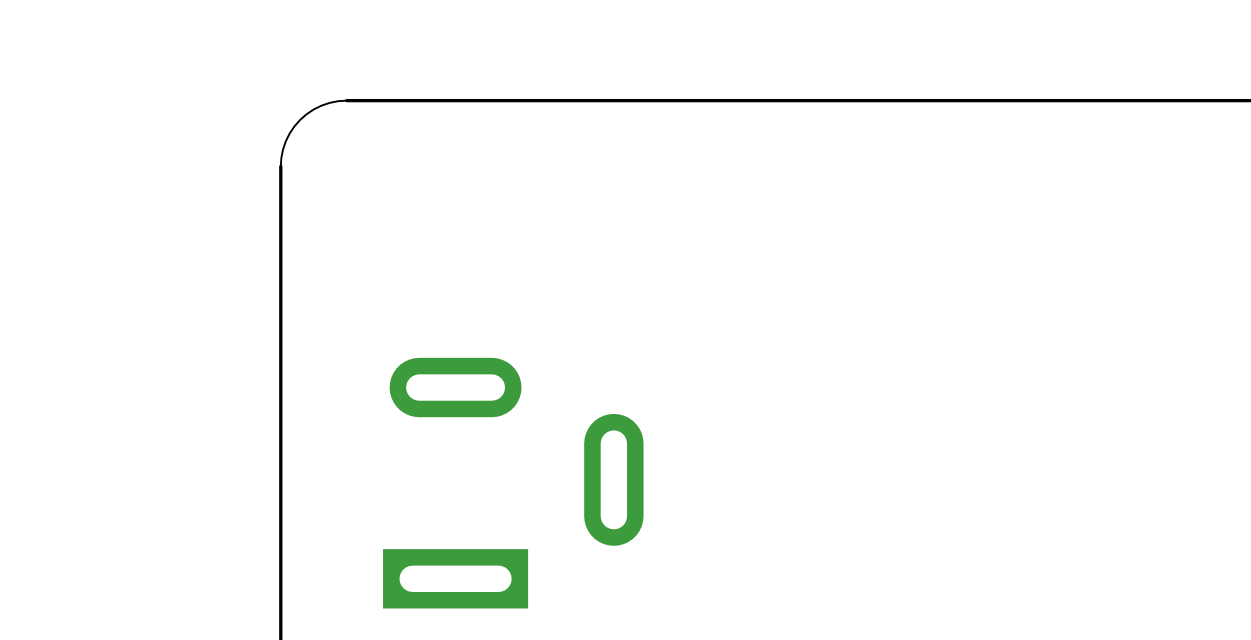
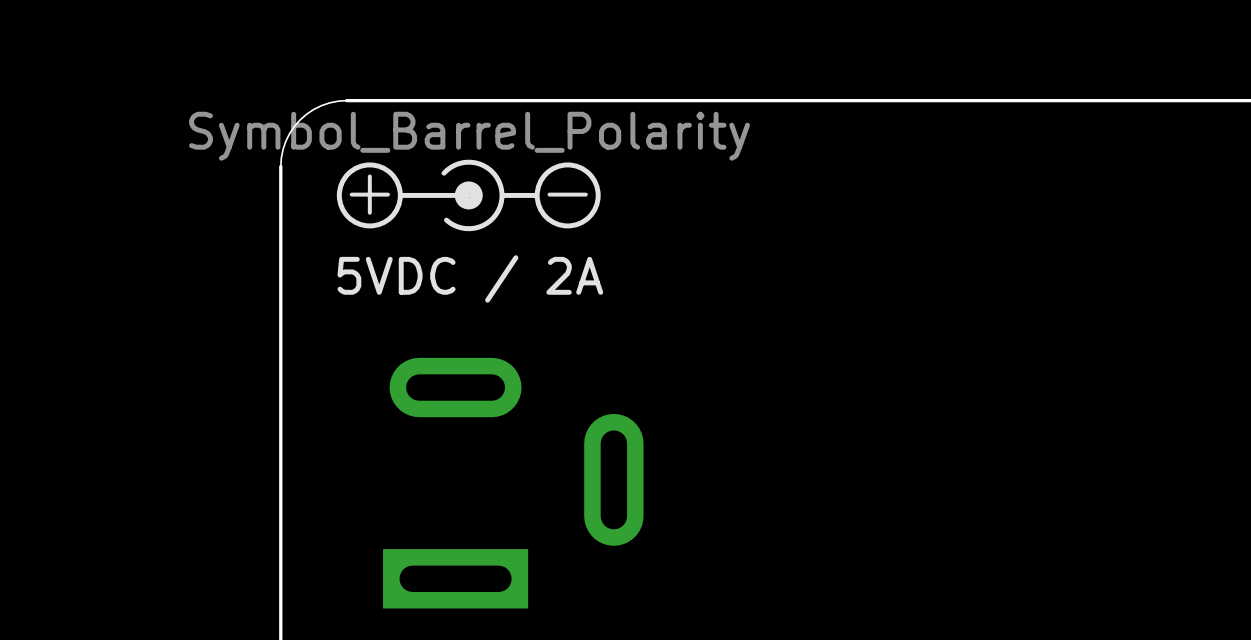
drawing: none -> [336, 159, 601, 232]
line: none -> (369, 176) (369, 212)
line: none -> (387, 194) (351, 194)
line: none -> (585, 194) (549, 194)
text: none -> 5VDC / 2A (470, 278)

